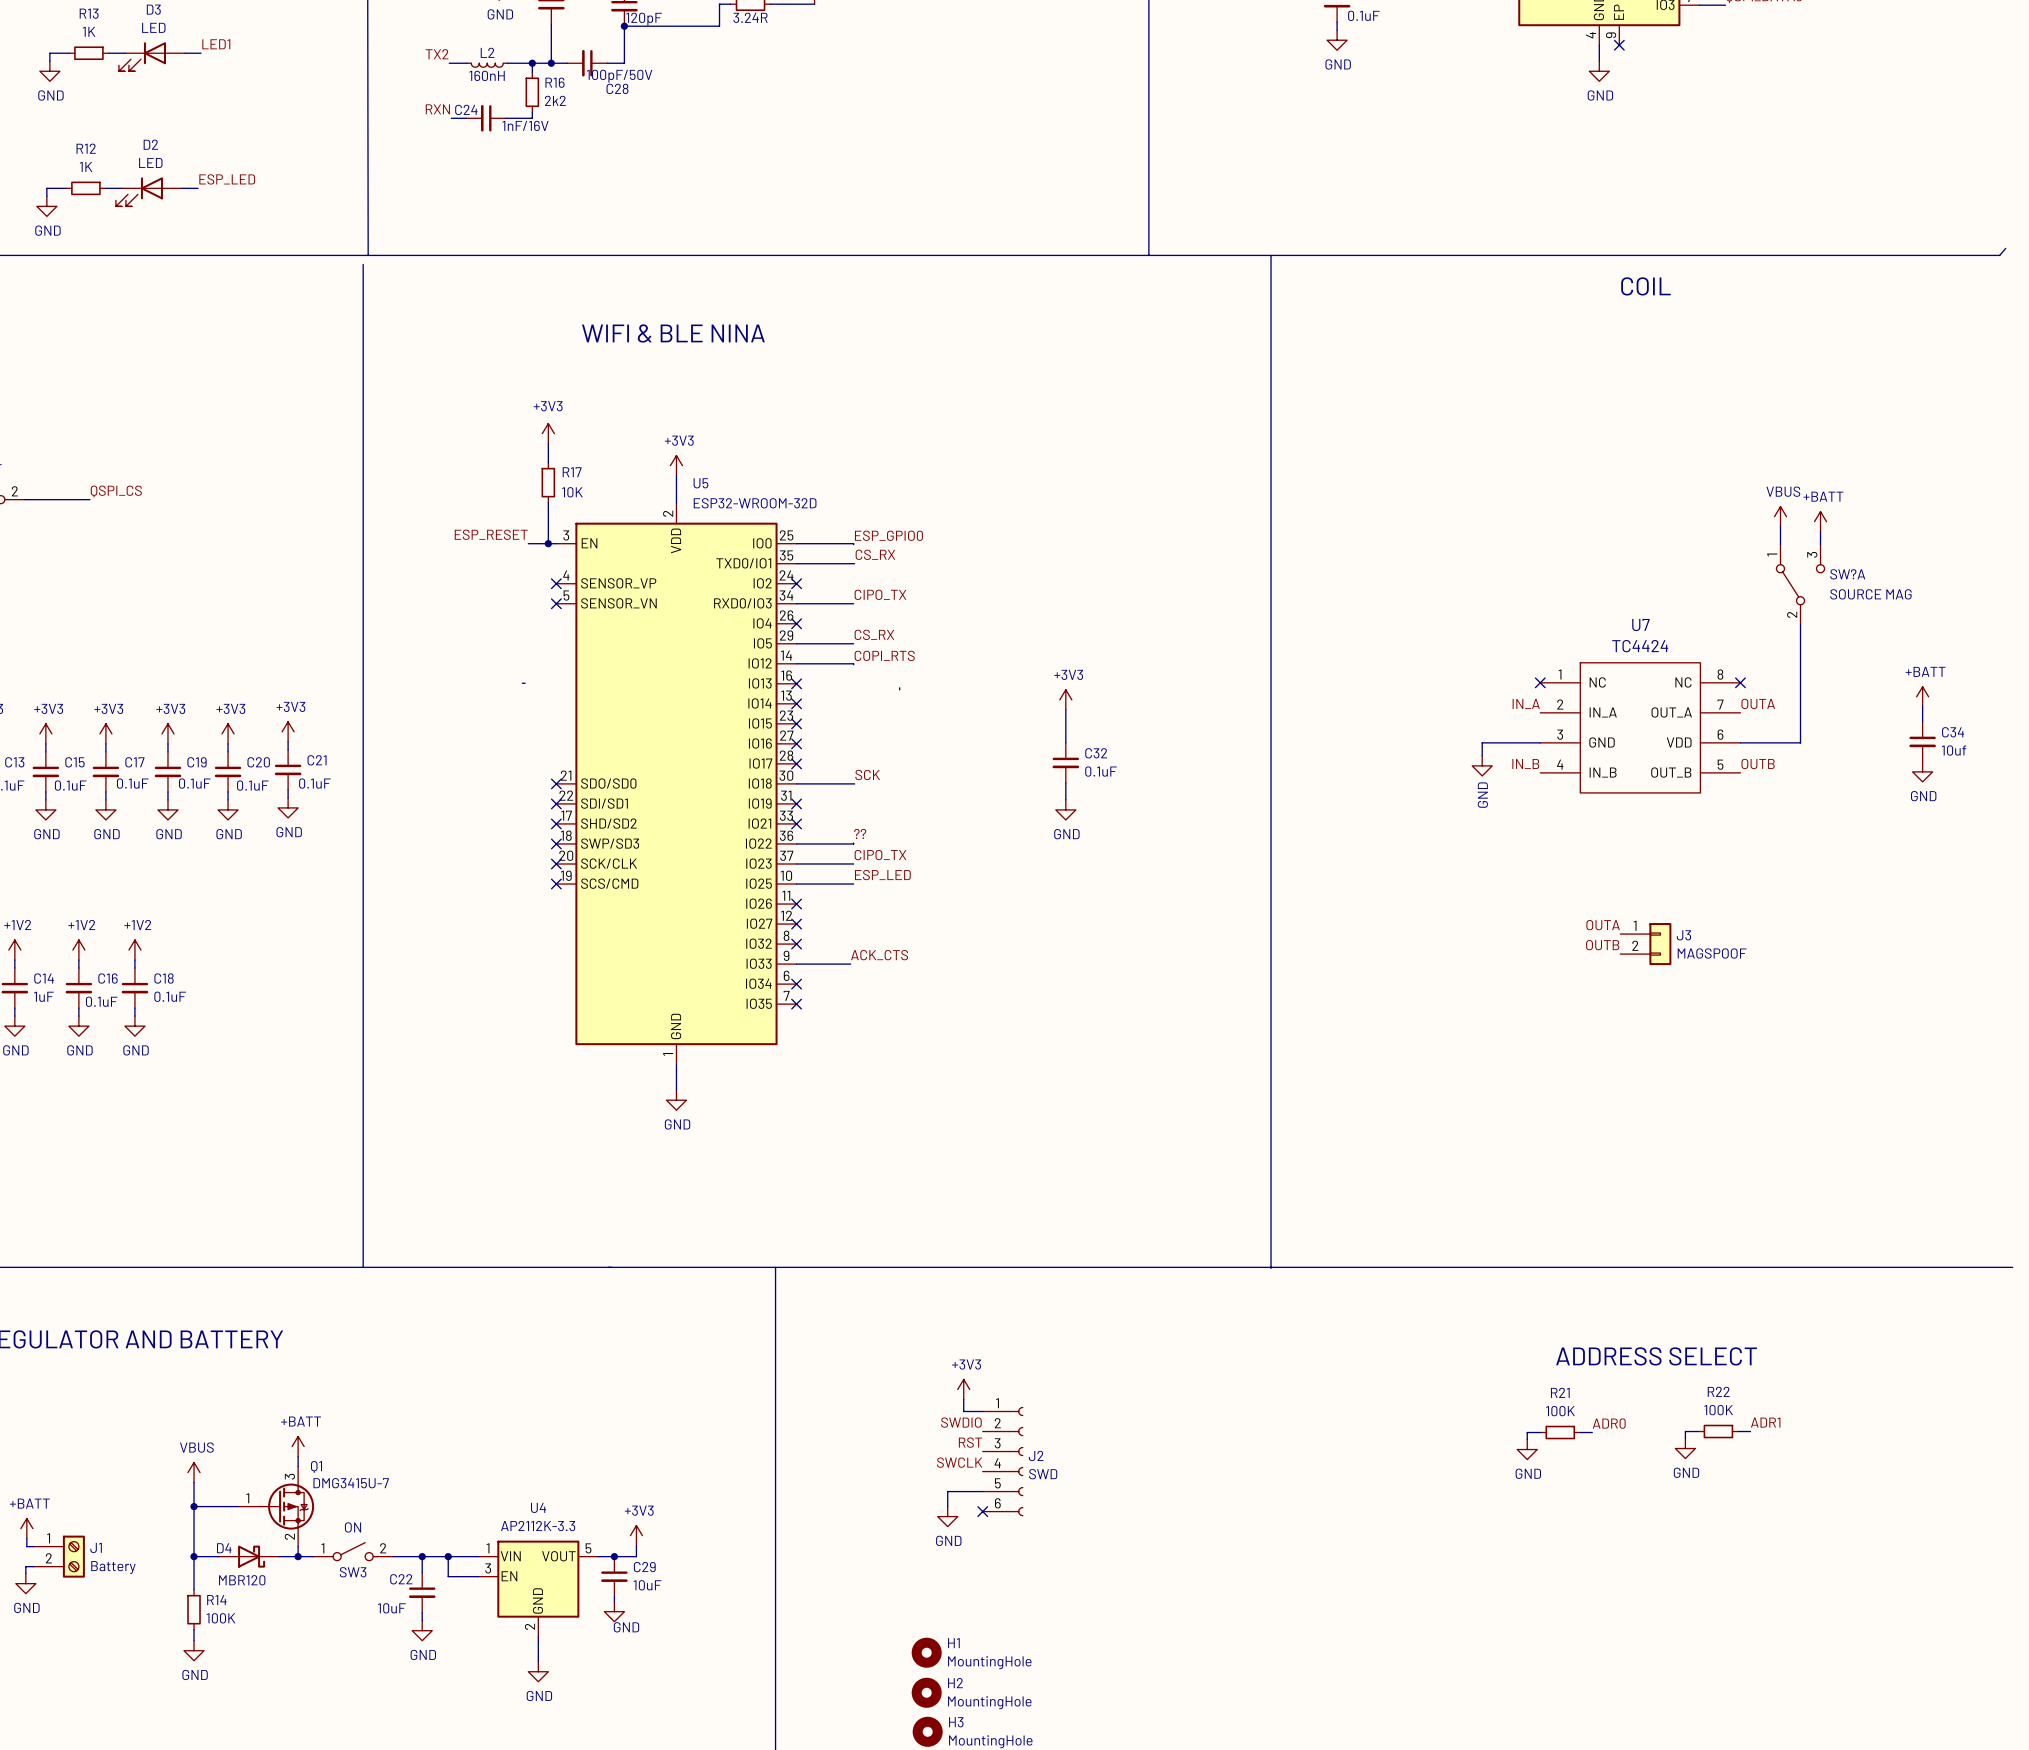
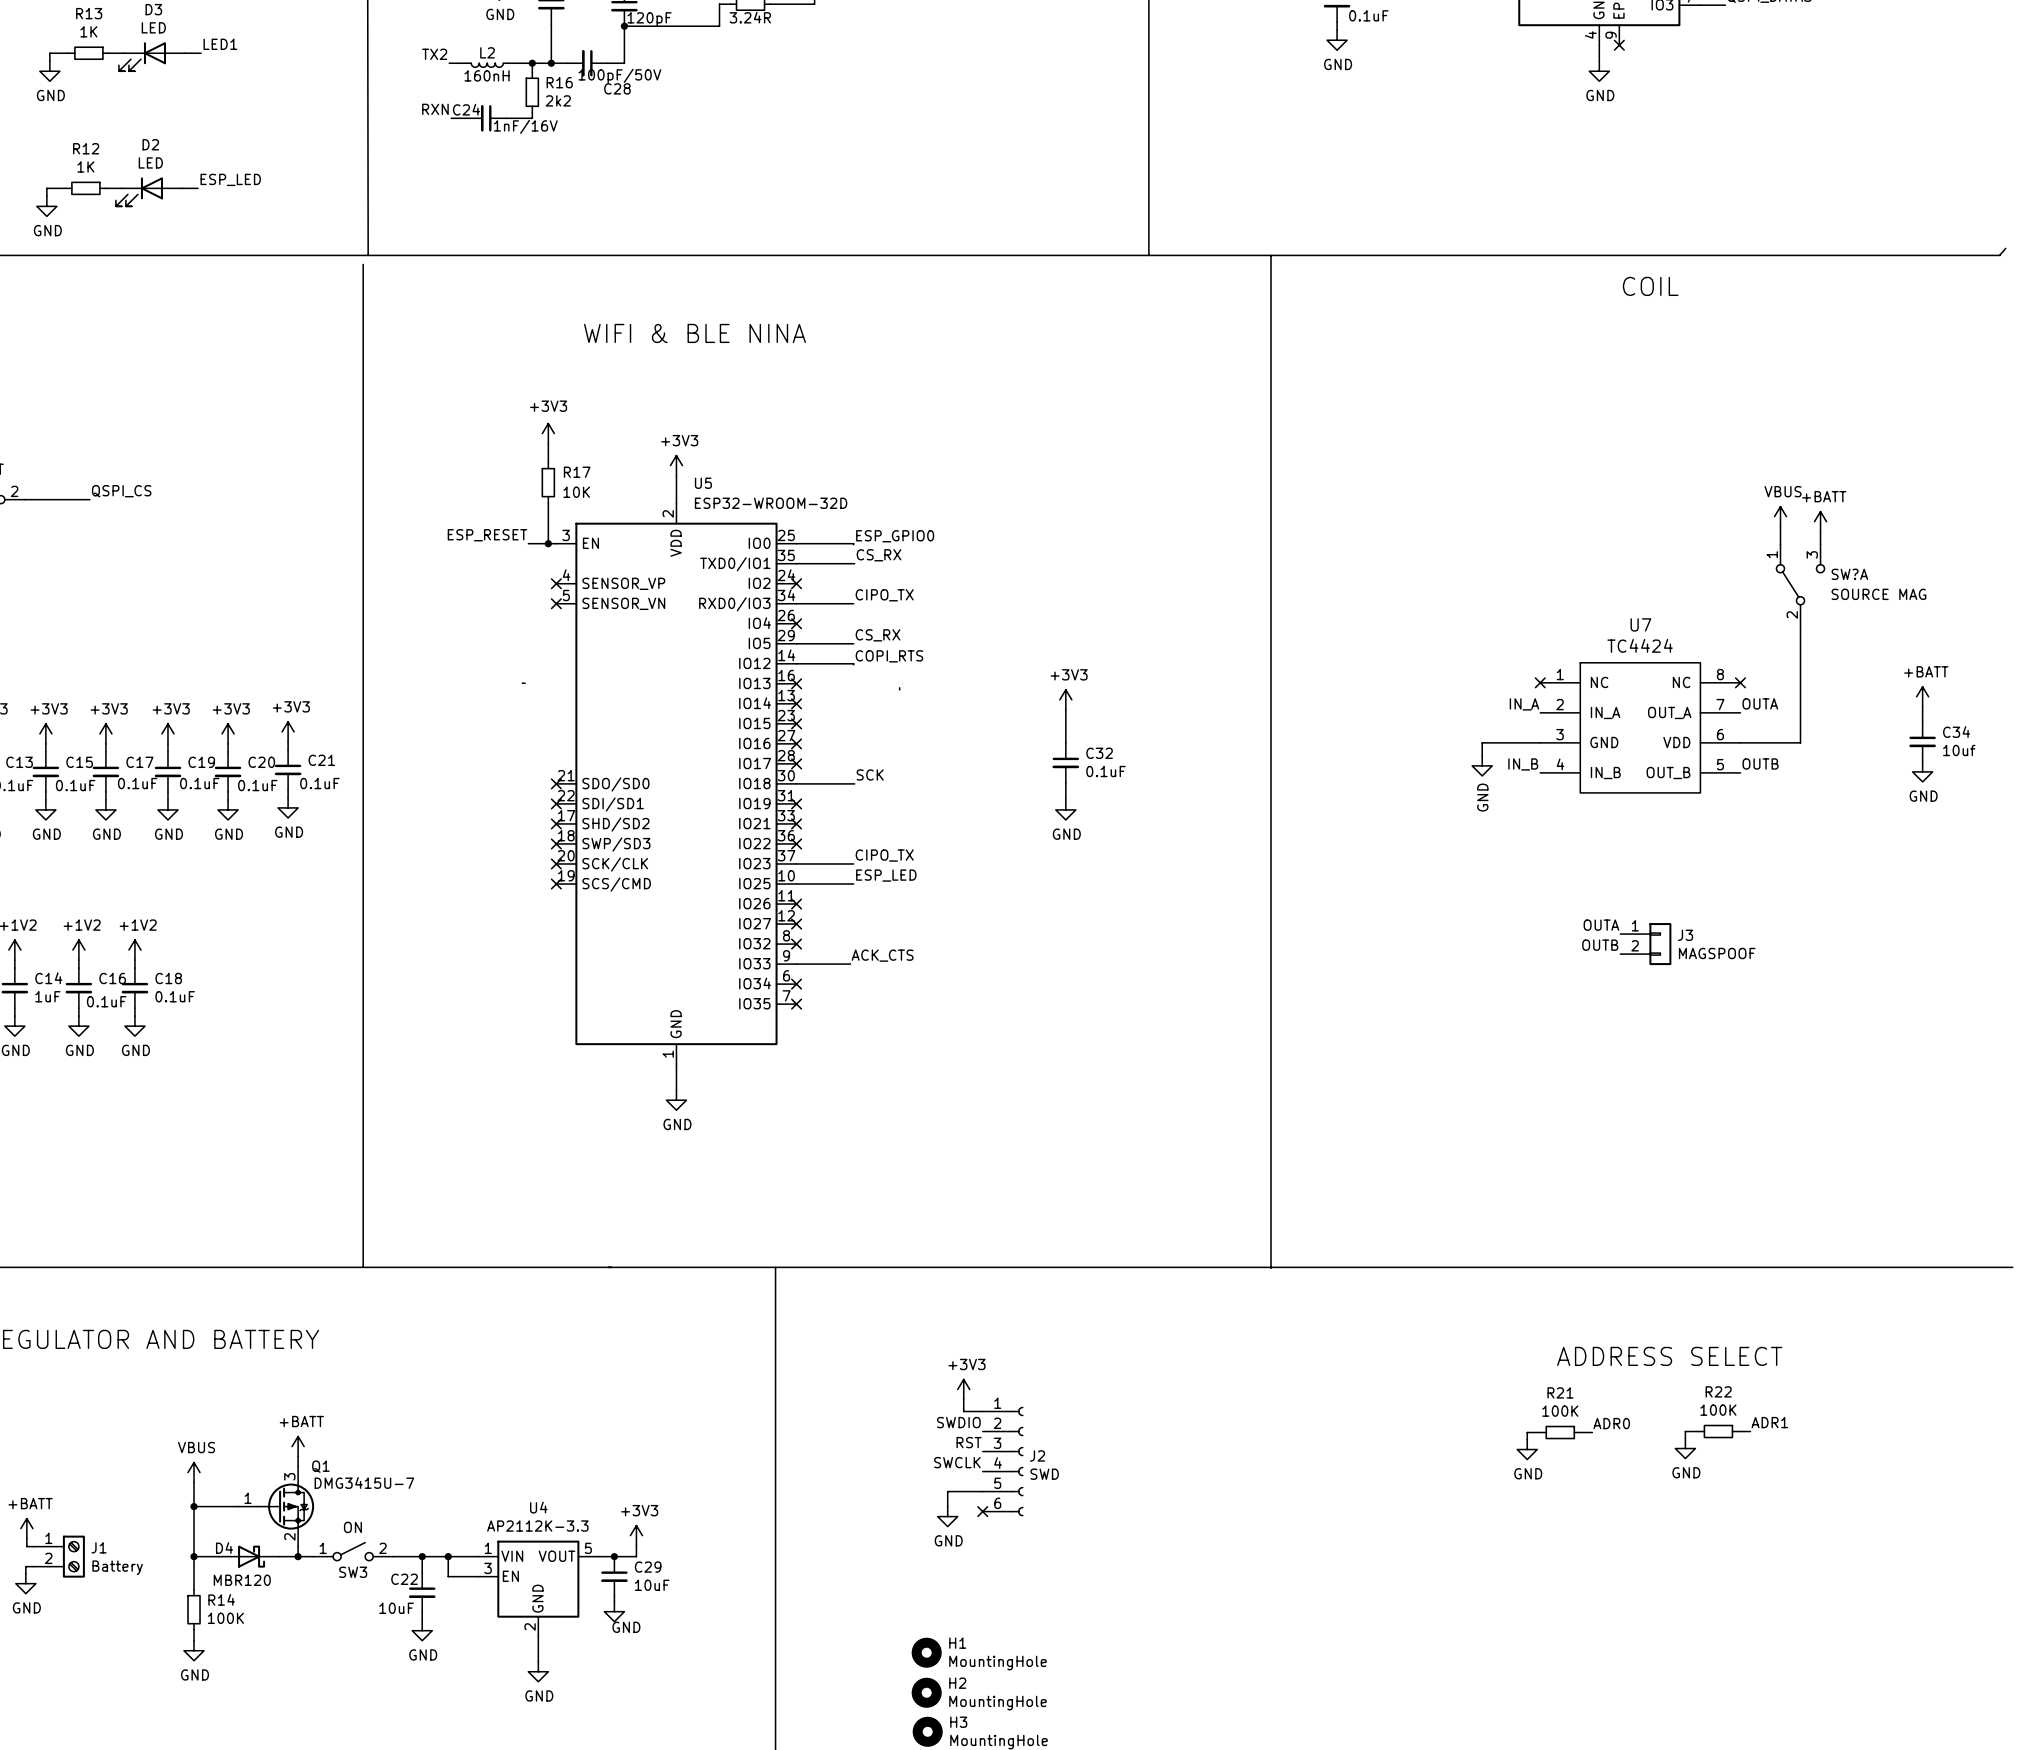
label: ?? (860, 833) -> none
wire: (853, 842) (796, 843) -> none
no-connect mark: none -> (796, 843)

